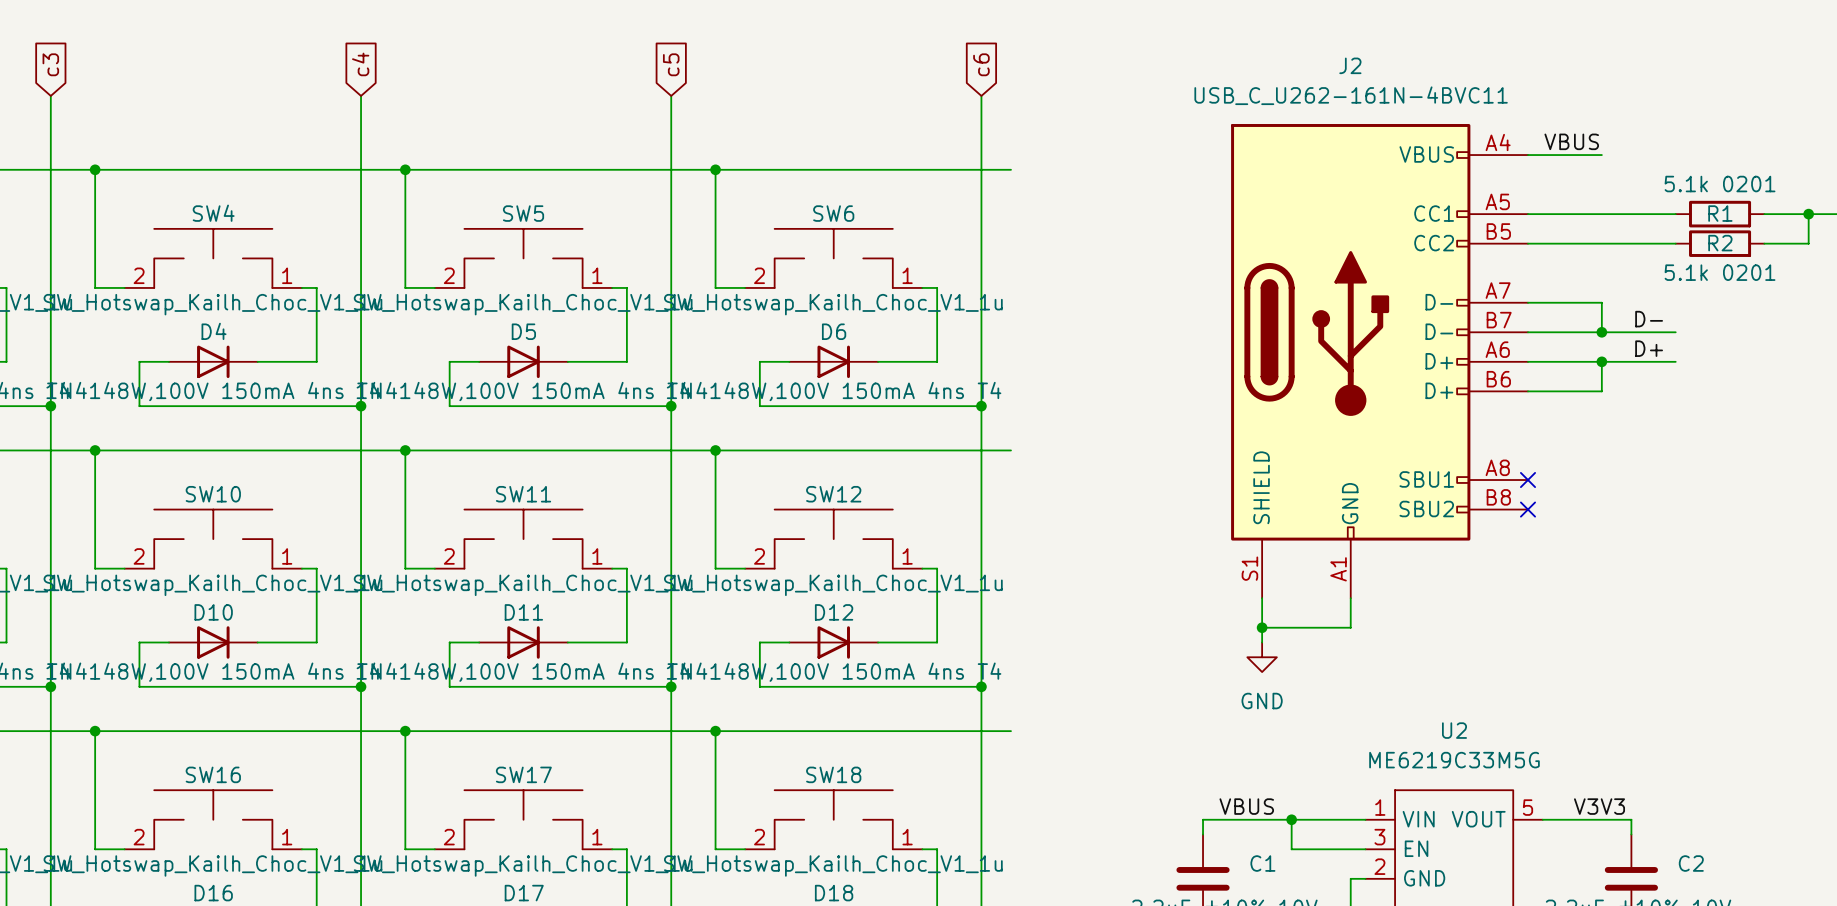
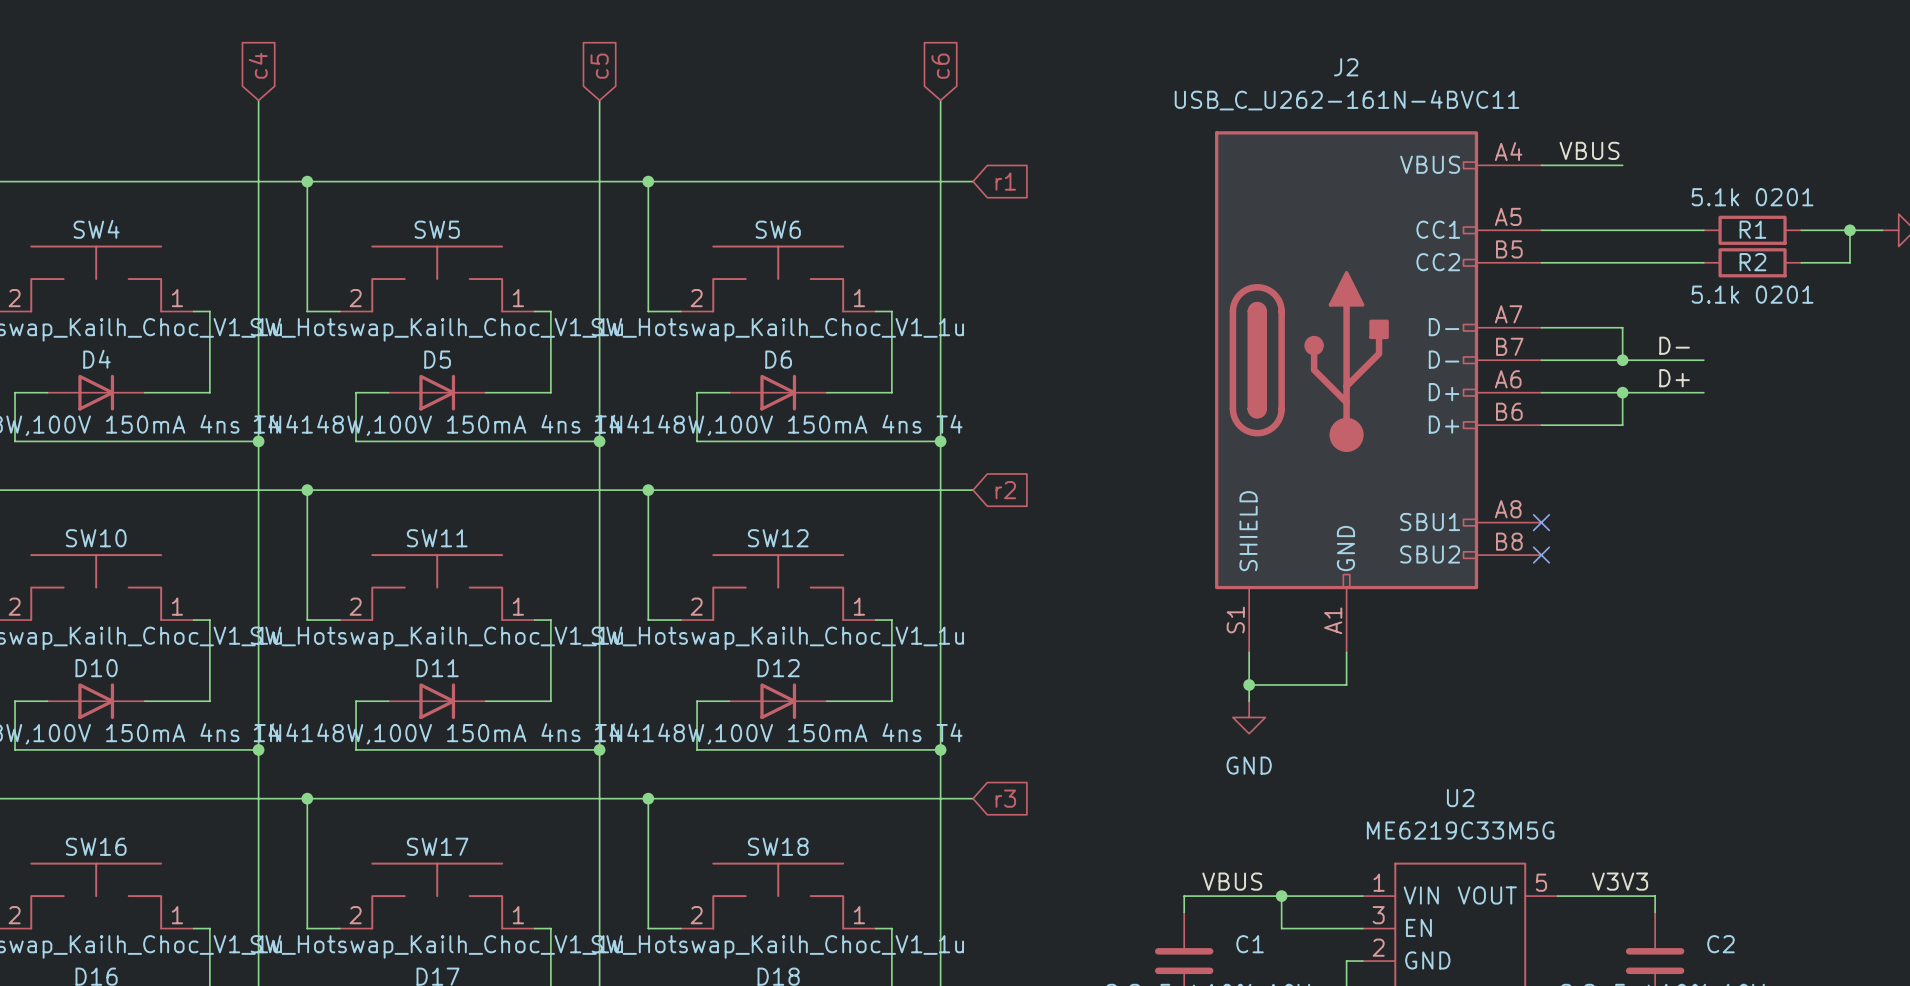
global label: none -> r1 (1005, 181)
global label: none -> r2 (1005, 490)
global label: none -> r3 (1005, 798)

